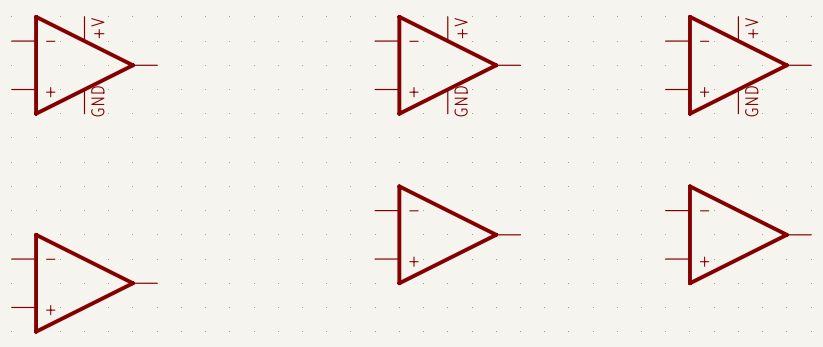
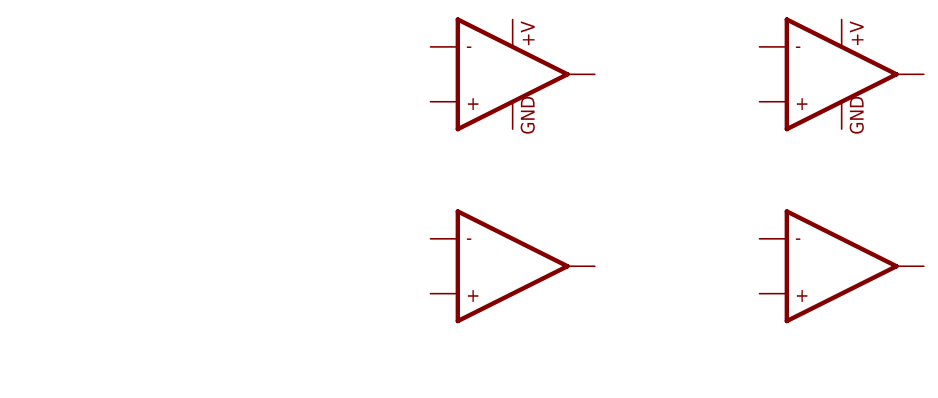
part: (84, 65) -> none
part: (84, 283) -> none

